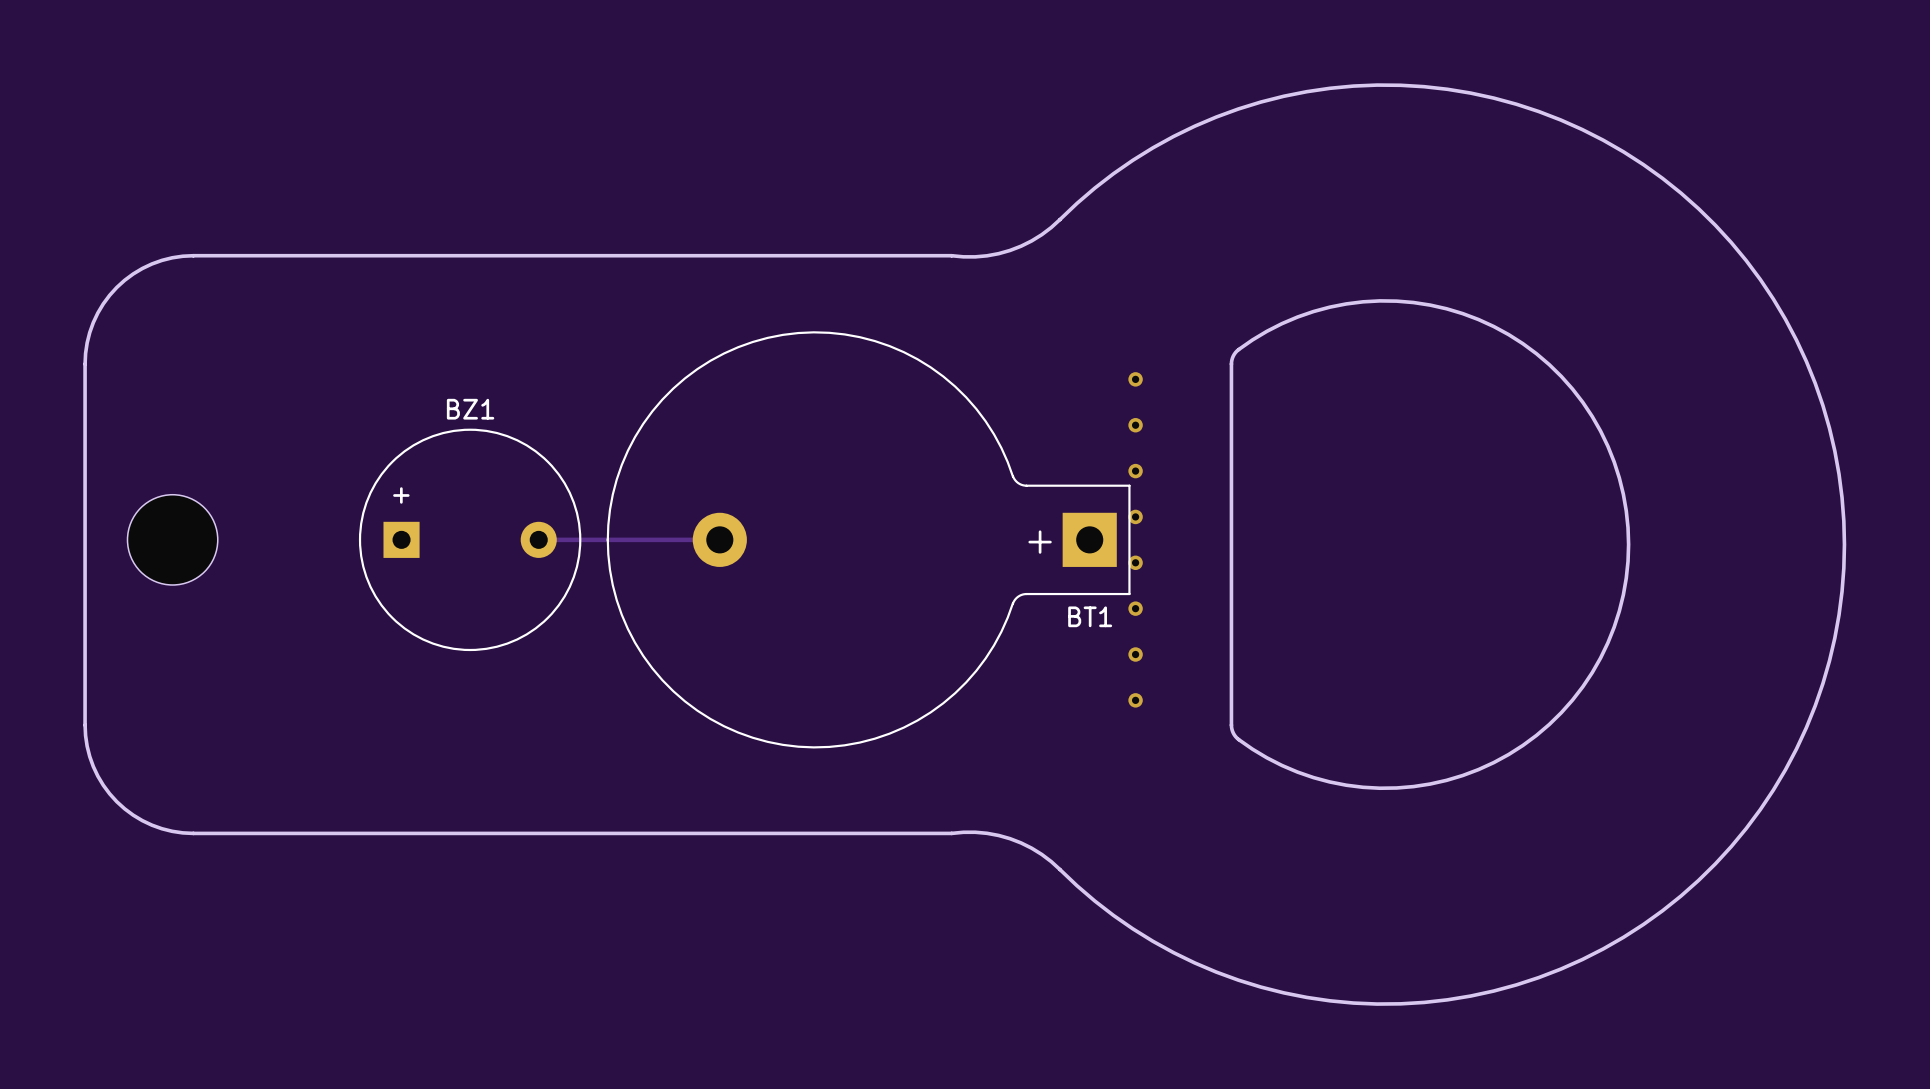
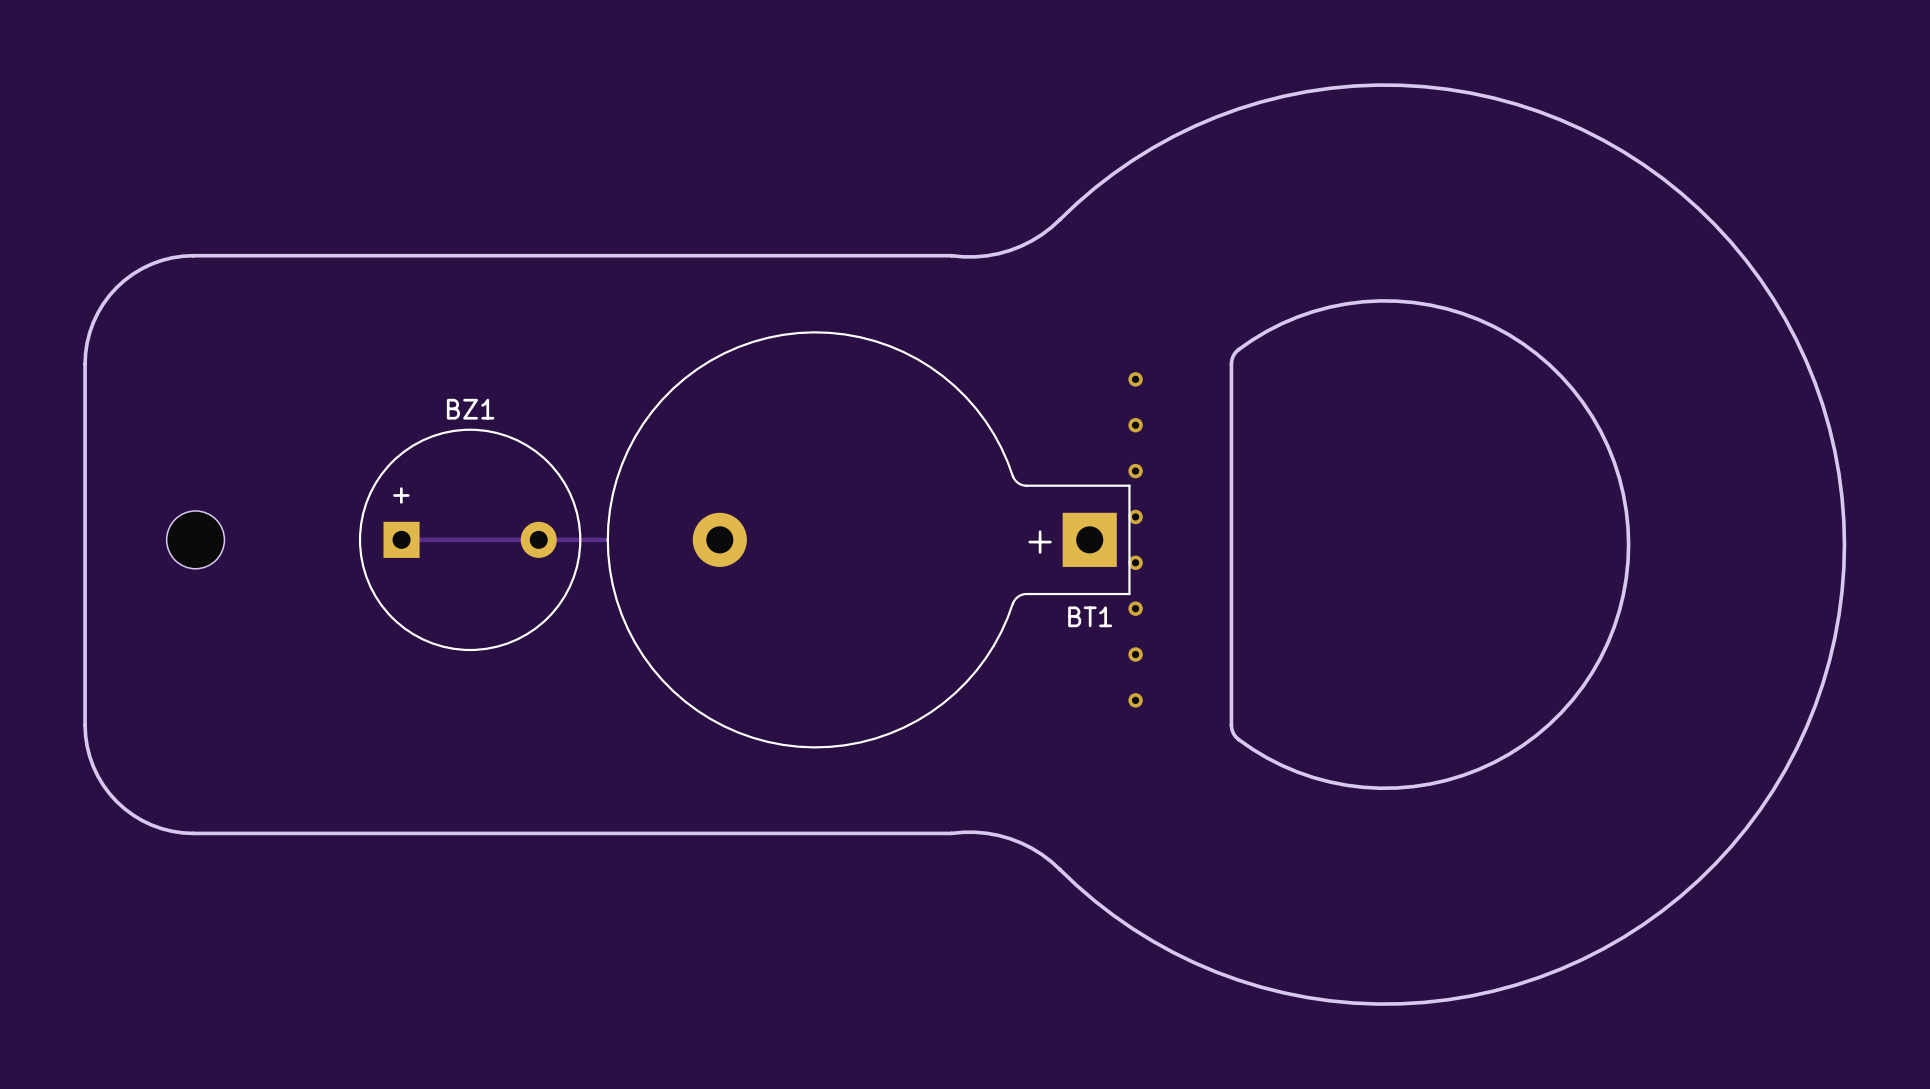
part: (172, 539) -> none
part: none -> (195, 539)
track: none -> (538, 539) (401, 539)
track: (719, 539) (605, 539) -> none

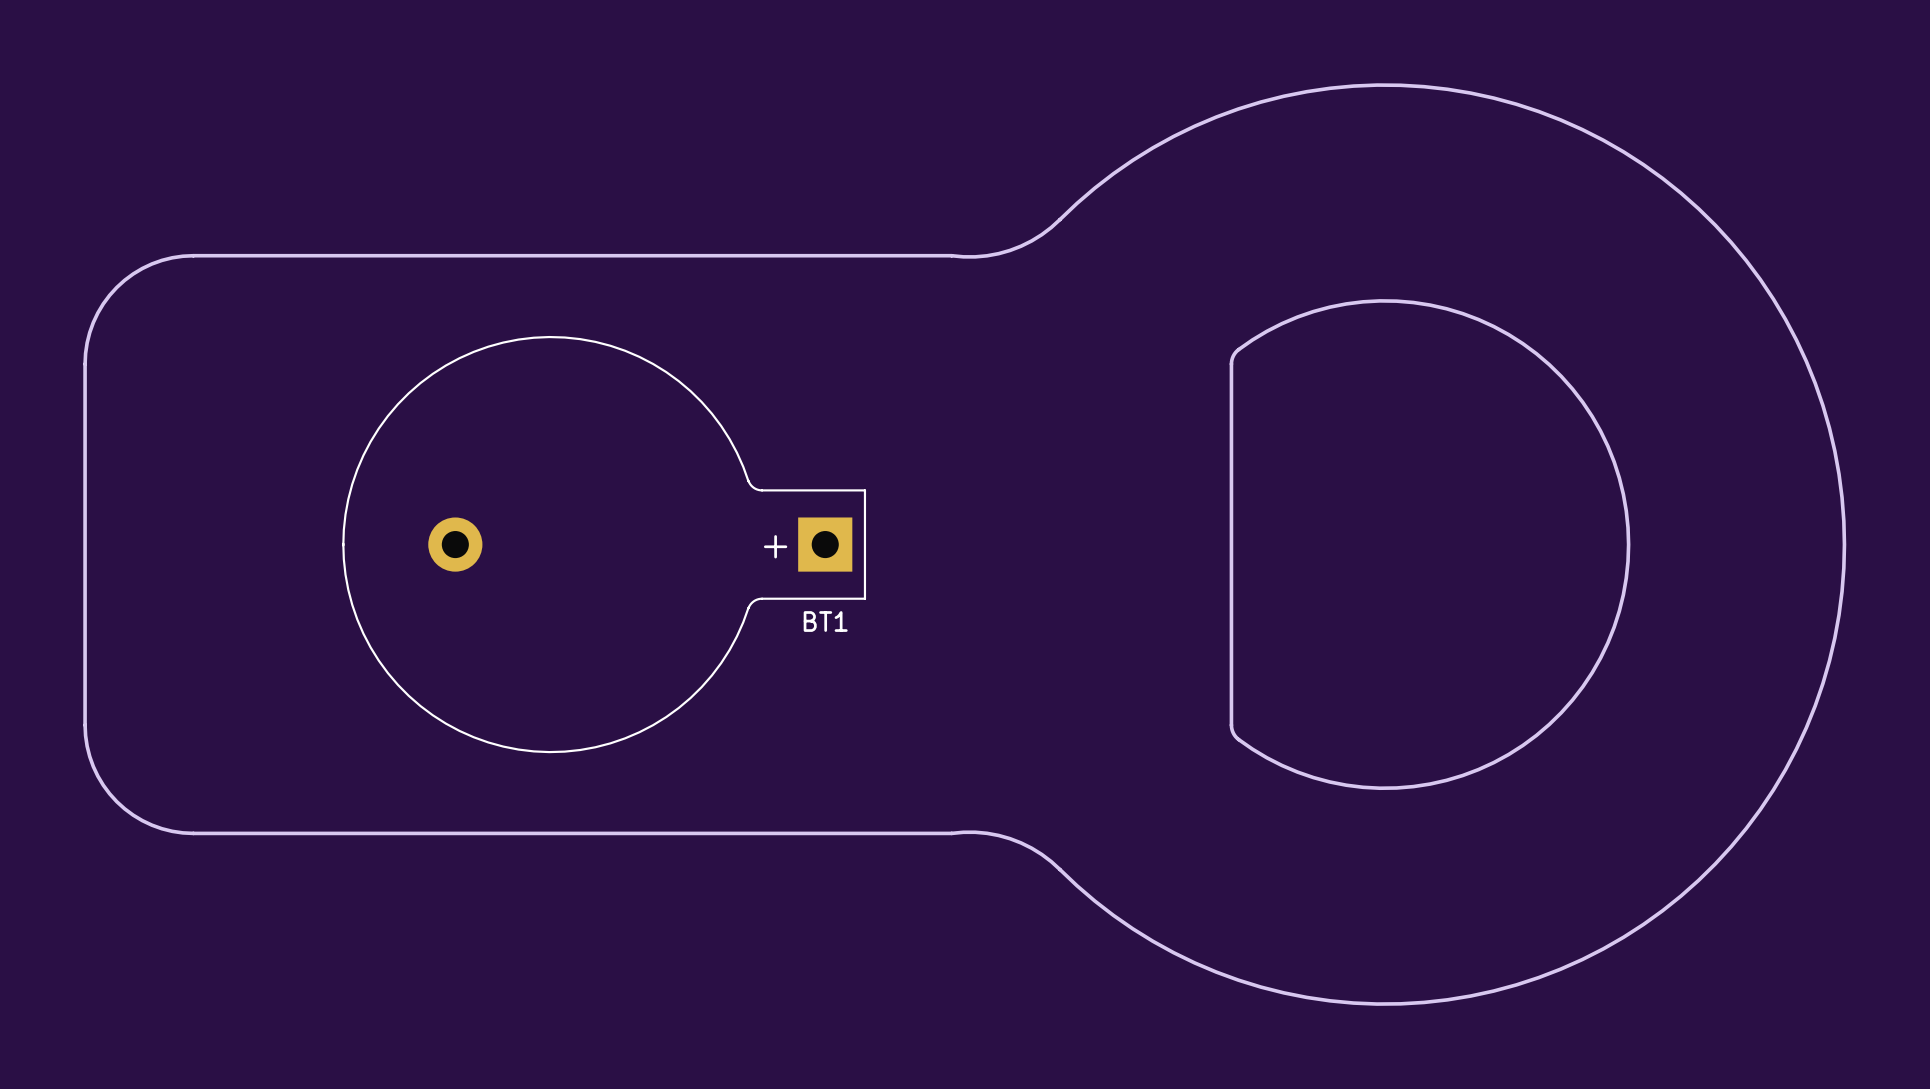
via: (1135, 379) -> none
via: (1135, 425) -> none
via: (1135, 471) -> none
via: (1135, 516) -> none
part: (195, 539) -> none
BZ1: (470, 539) -> none
track: (605, 539) (401, 539) -> none
BT1 position: (868, 539) -> (604, 544)
via: (1135, 562) -> none
via: (1135, 608) -> none
via: (1135, 654) -> none
via: (1135, 700) -> none

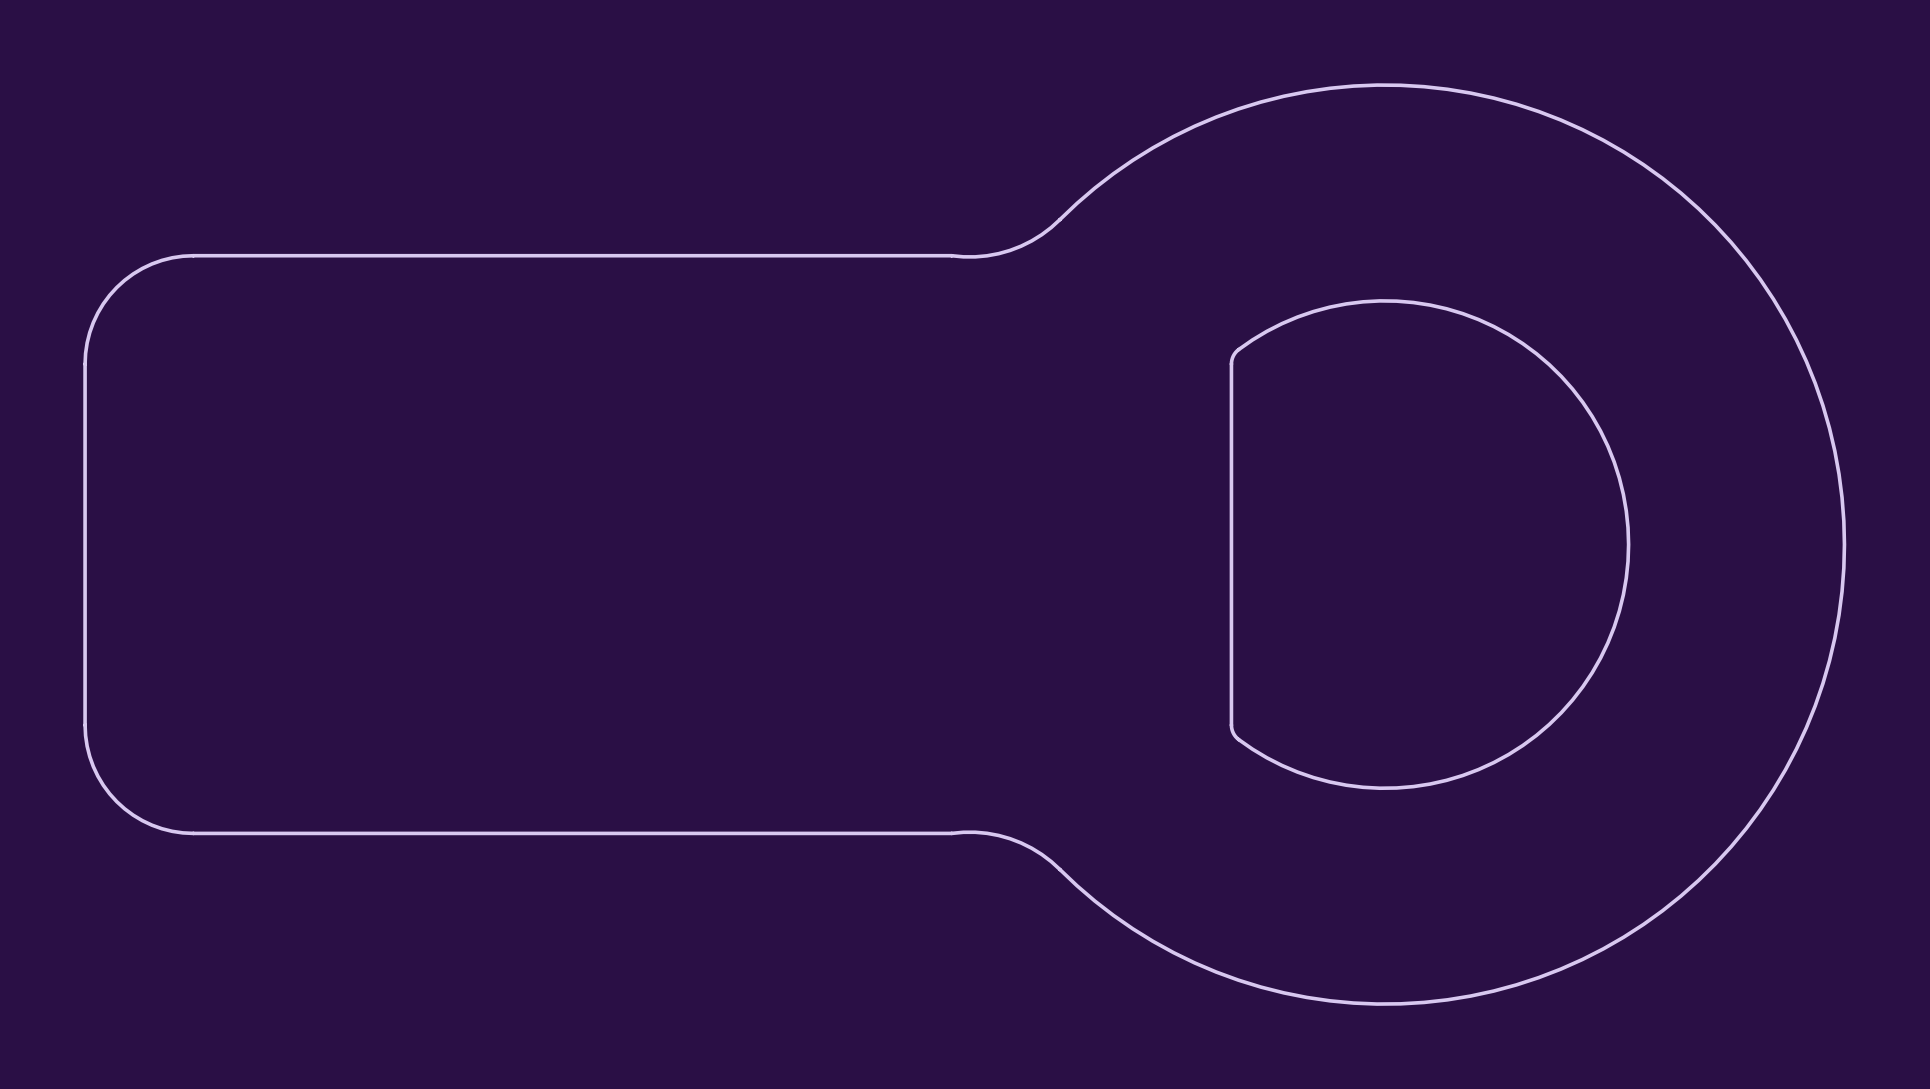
BT1: (604, 544) -> none

